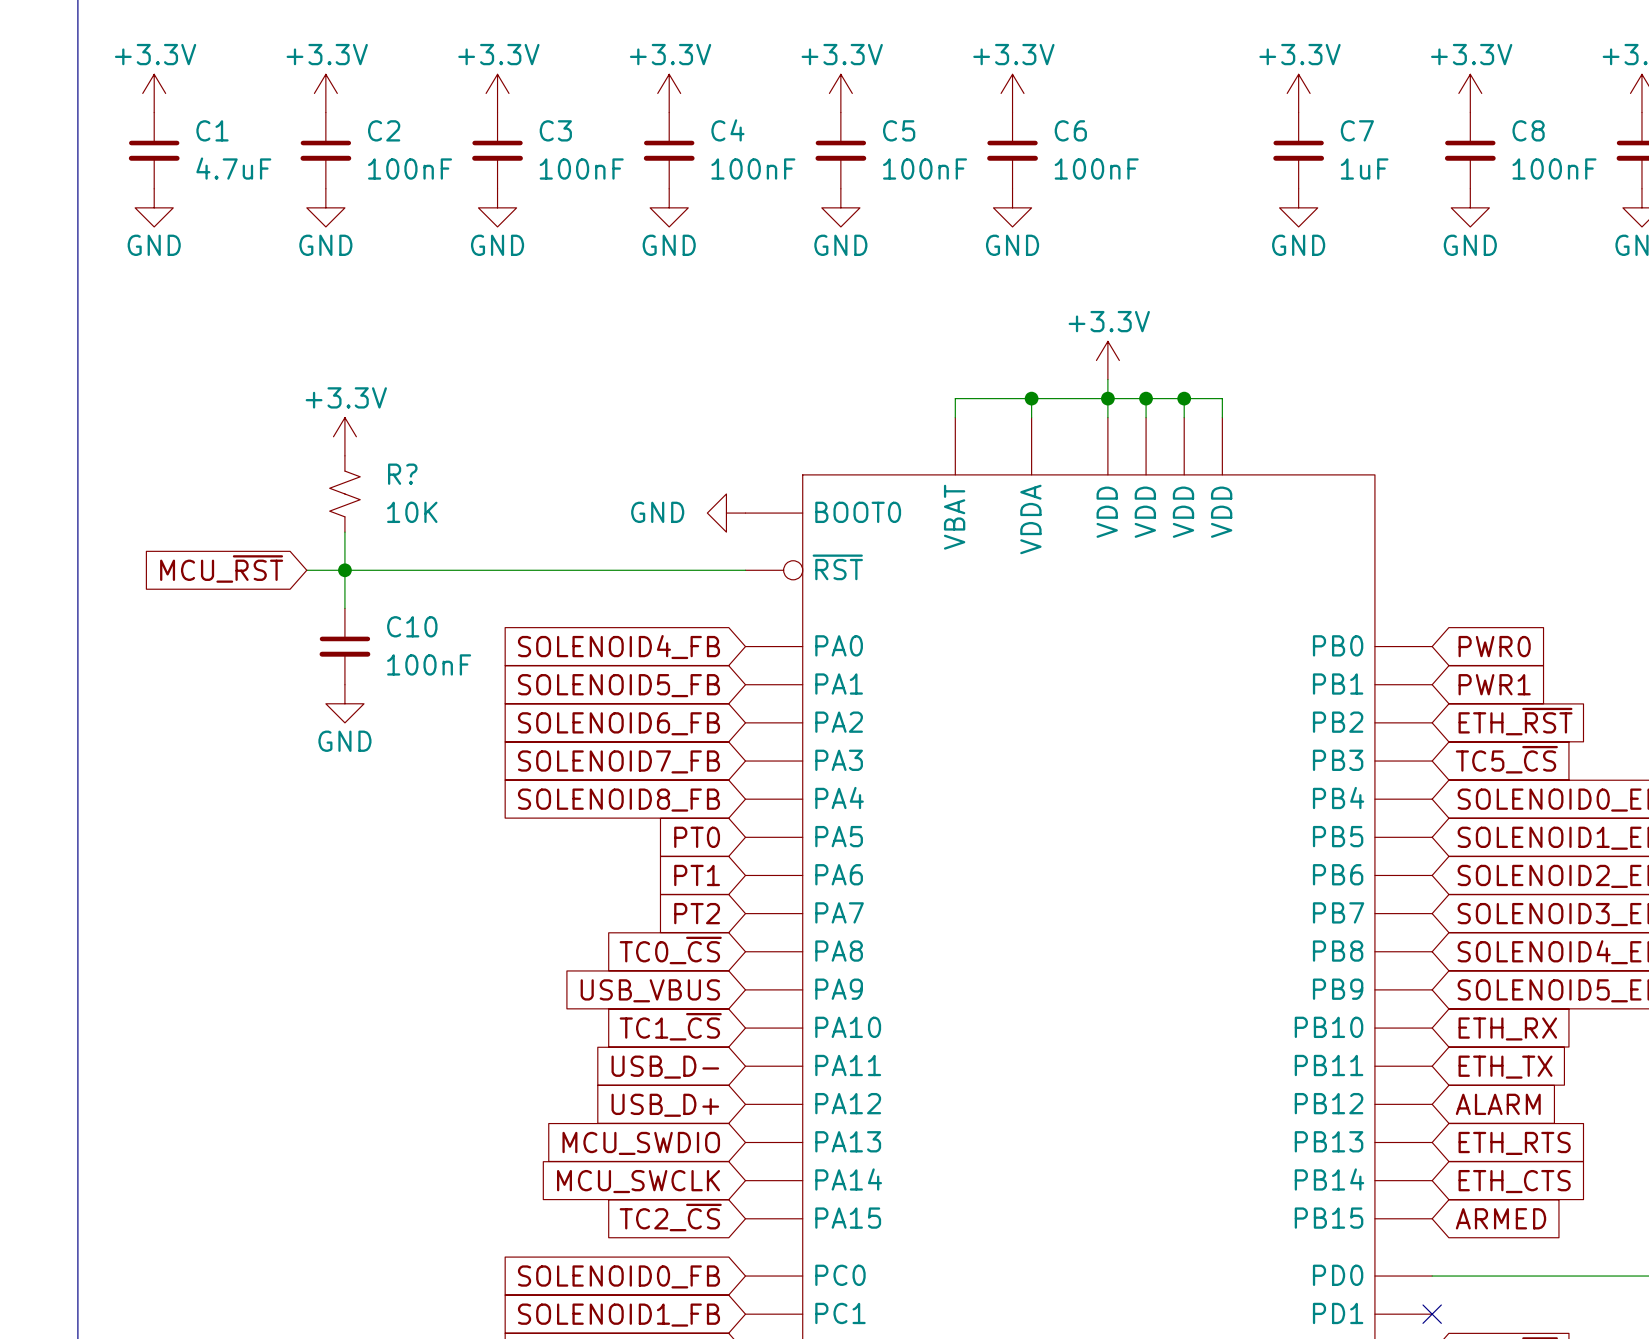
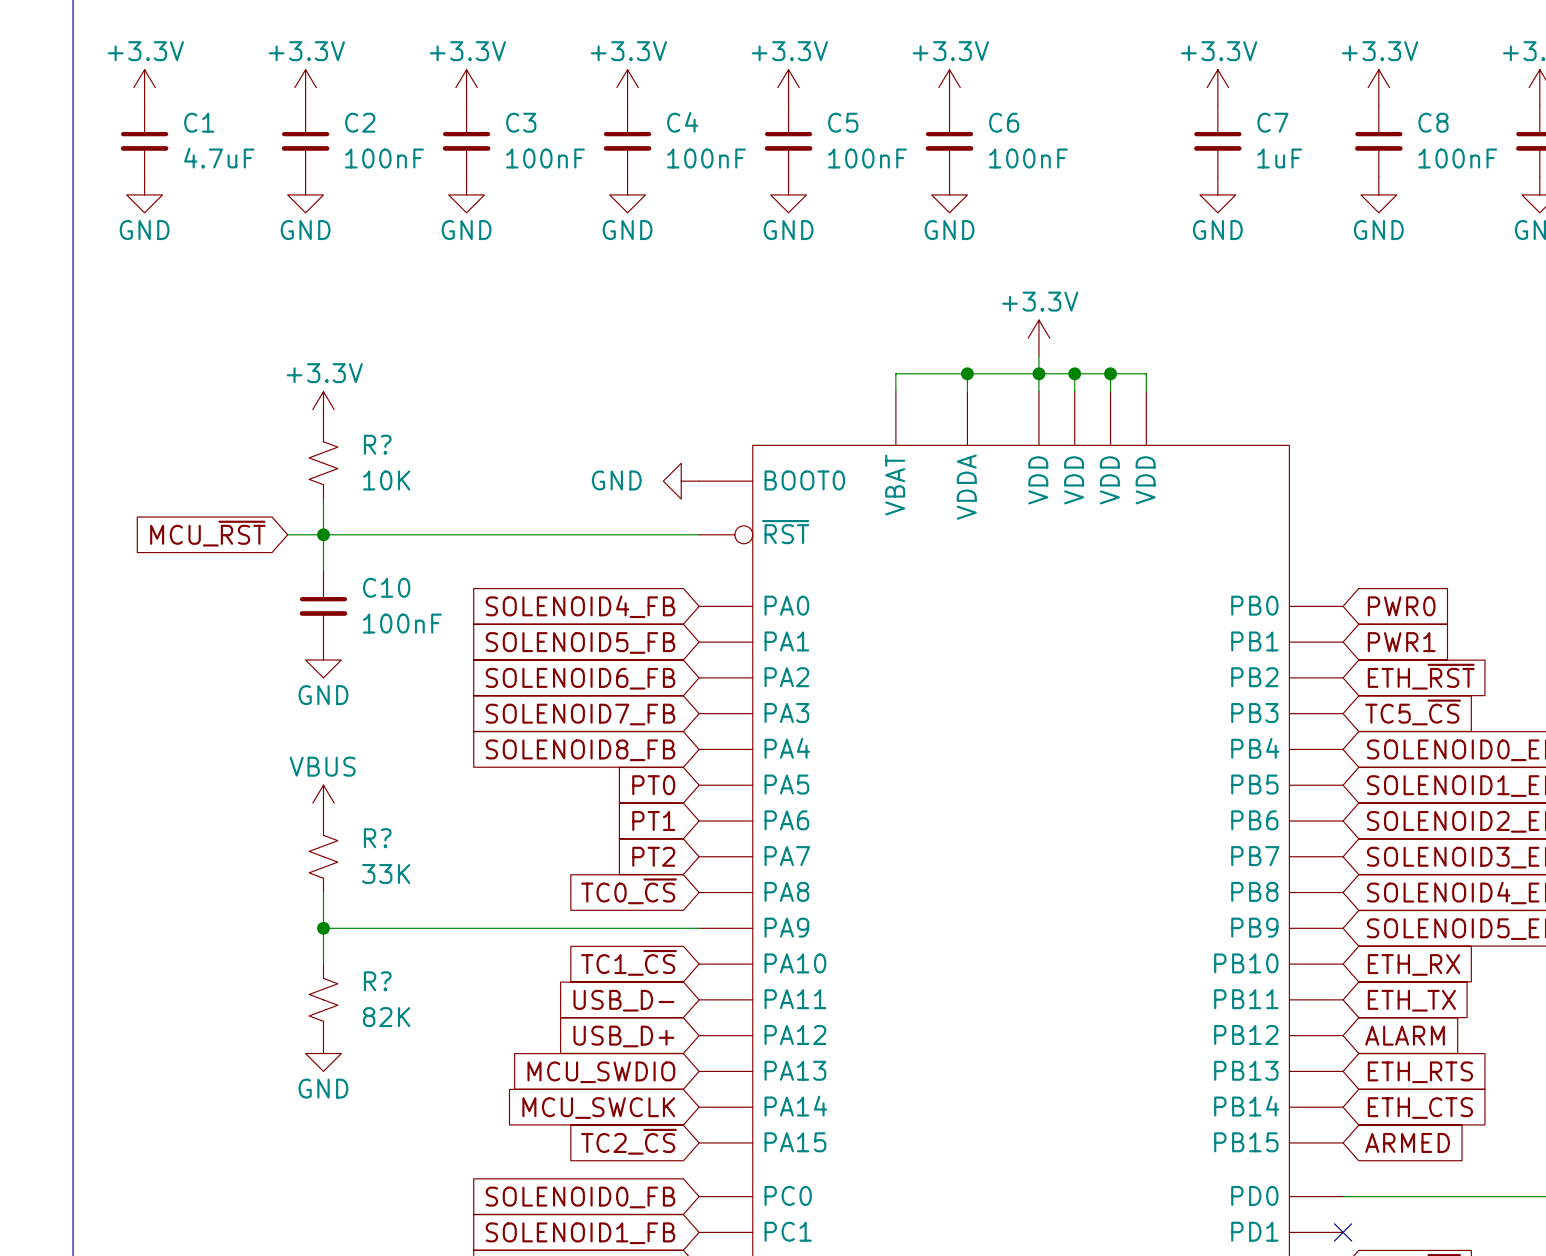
power symbol: none -> VBUS (323, 803)
R?: none -> 33K (323, 856)
wire: none -> (323, 892) (323, 964)
wire: none -> (323, 928) (699, 928)
junction: none -> (323, 928)
global label: USB_VBUS (650, 990) -> none
R?: none -> 82K (323, 999)
power symbol: none -> GND (323, 1053)

